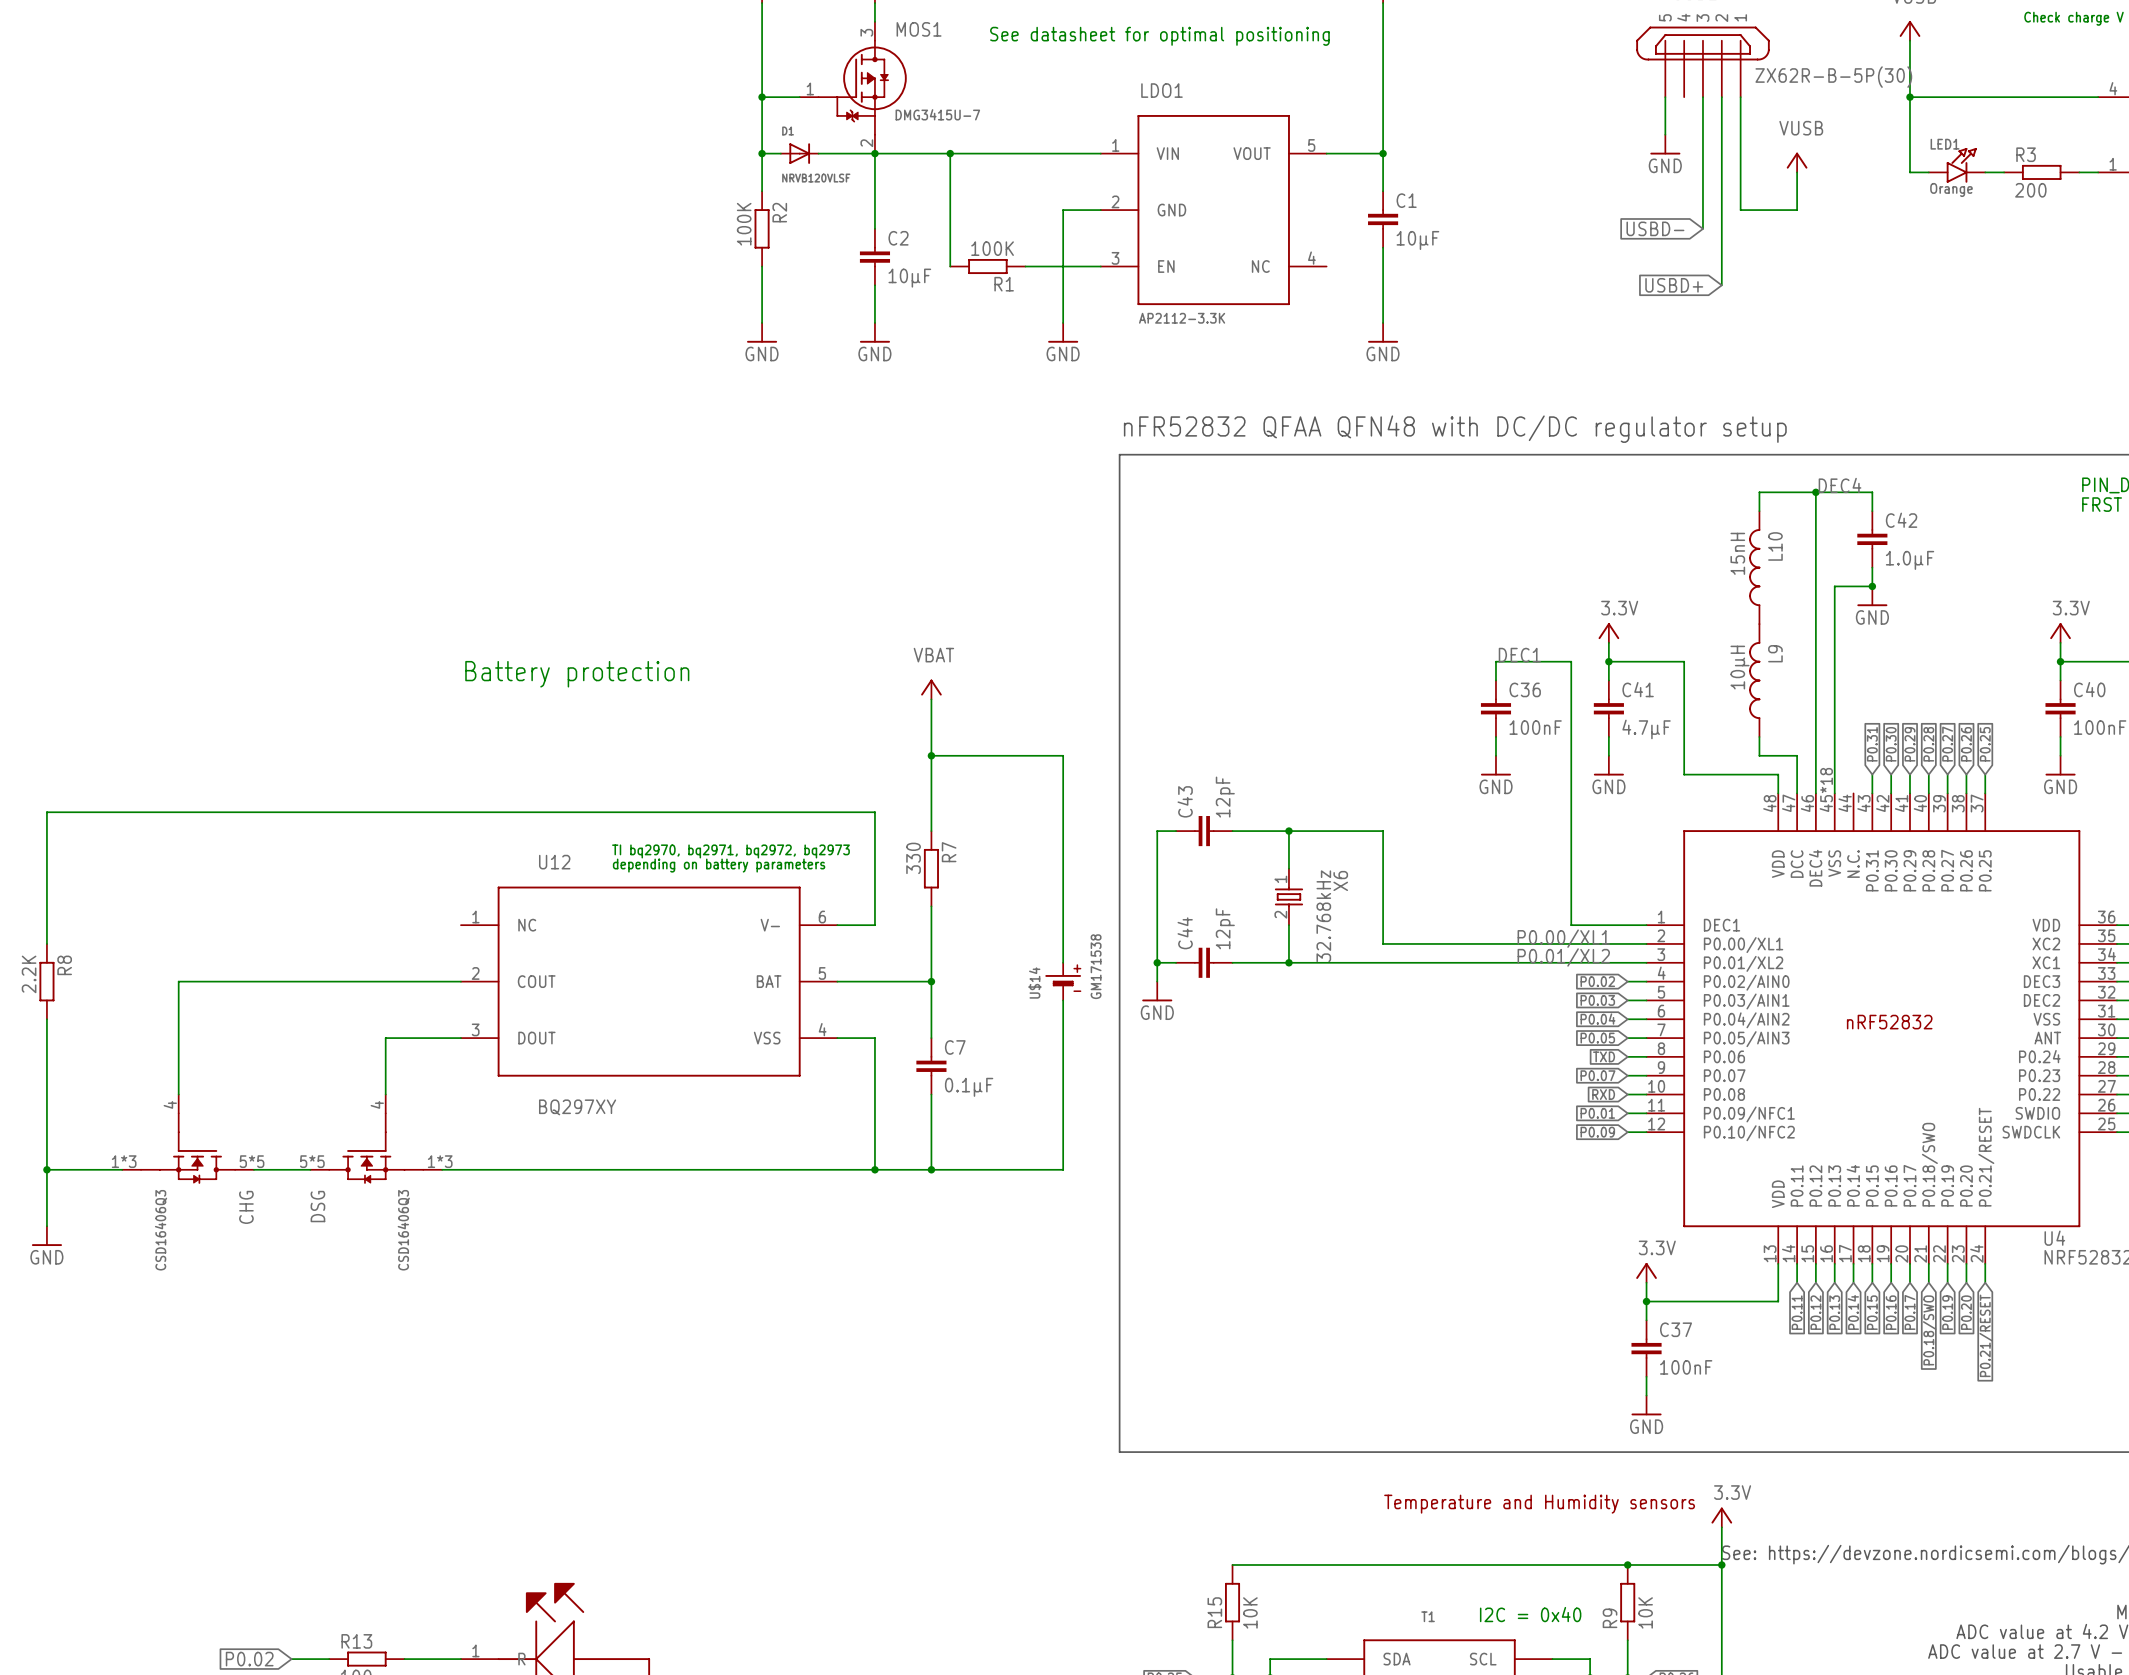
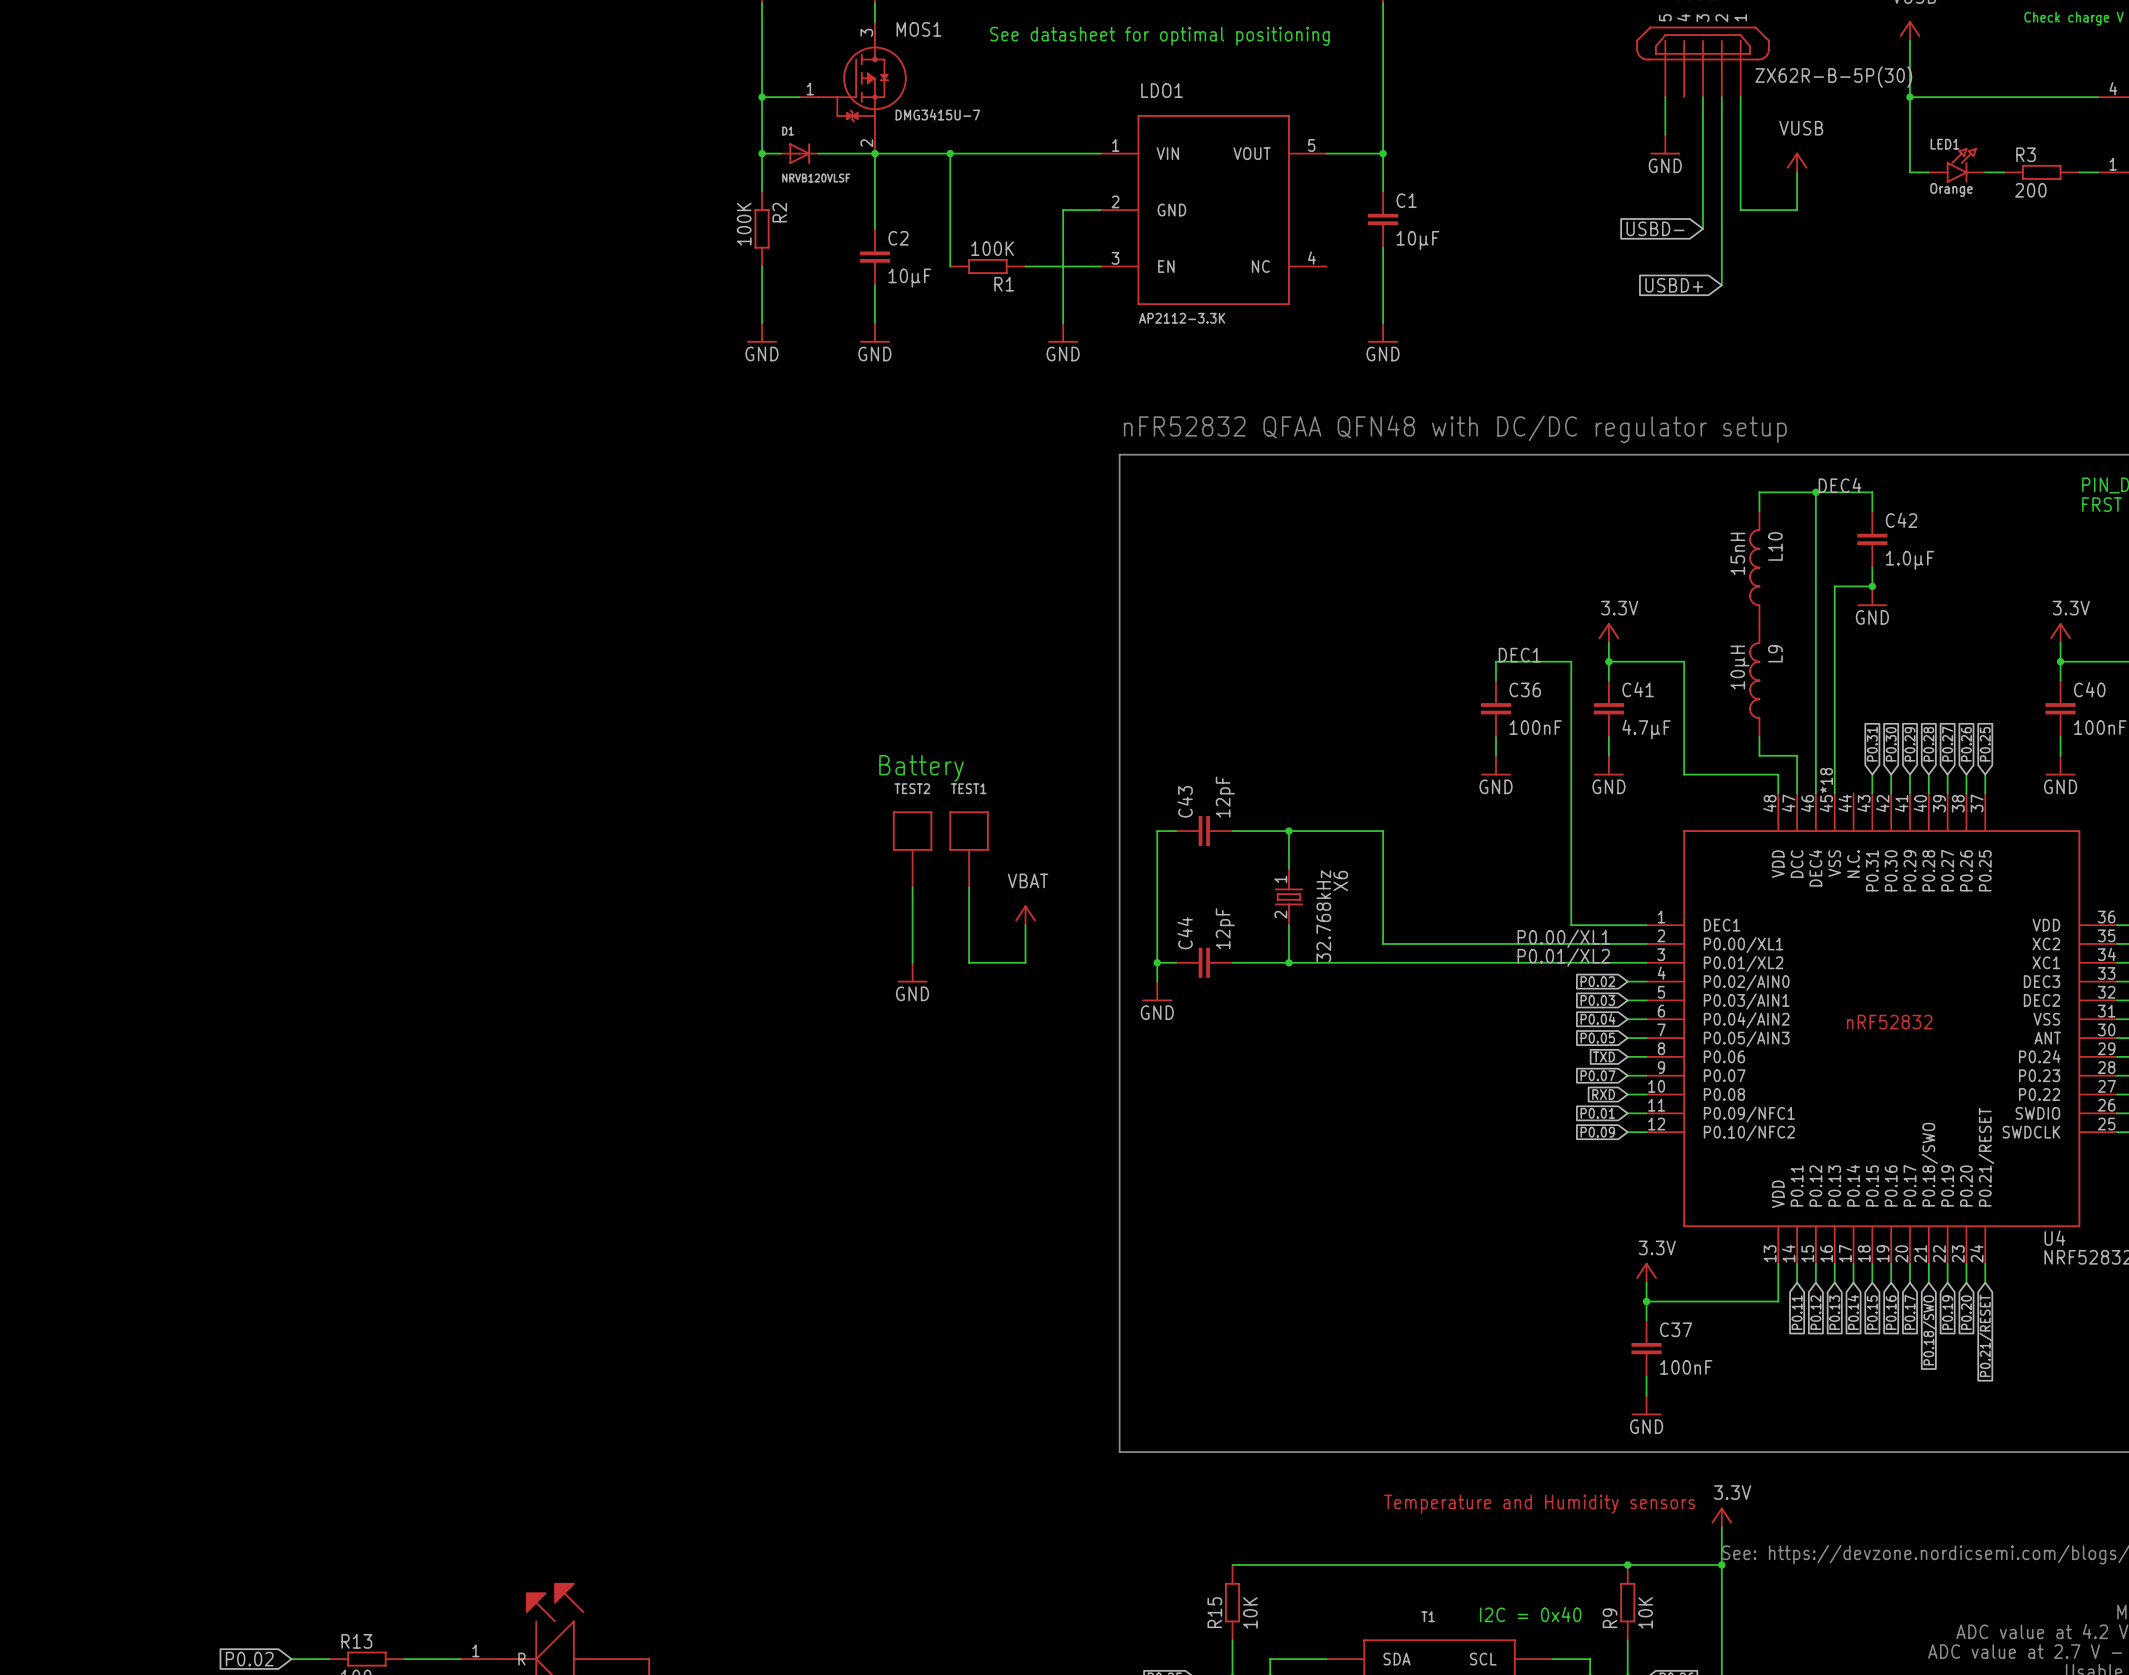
text: Battery protection (577, 674) -> none
power symbol: VBAT (931, 689) -> none
wire: (931, 699) (931, 831) -> none
wire: (931, 755) (1063, 755) (1063, 962) -> none
junction: (931, 755) -> none
text: none -> Battery (921, 768)
TEST2: none -> (912, 849)
TEST1: none -> (969, 849)
text: TI bq2970, bq2971, bq2972, bq2973 (730, 851) -> none
text: depending on battery parameters (719, 865) -> none
R7: 330 (931, 868) -> none
wire: none -> (912, 887) (912, 962)
wire: none -> (969, 887) (969, 962) (1025, 962) (1025, 925)
wire: (931, 906) (931, 1038) -> none
power symbol: none -> VBAT (1025, 915)
wire: (837, 925) (874, 925) (874, 812) (46, 812) (46, 943) -> none
power symbol: none -> GND (912, 972)
R8: 2.2K (46, 981) -> none
wire: (460, 981) (178, 981) (178, 1094) -> none
U12: BQ297XY (649, 981) -> none
wire: (837, 981) (931, 981) -> none
junction: (931, 981) -> none
U$14: GM171538 (1063, 981) -> none
wire: (1063, 1000) (1063, 1169) (442, 1169) -> none
wire: (46, 1019) (46, 1226) -> none
wire: (460, 1038) (385, 1038) (385, 1094) -> none
wire: (837, 1038) (874, 1038) (874, 1169) -> none
C7: 0.1µF (931, 1066) -> none
wire: (931, 1094) (931, 1169) -> none
CHG: CSD16406Q3 (188, 1139) -> none
DSG: CSD16406Q3 (376, 1139) -> none
wire: (46, 1169) (122, 1169) -> none
junction: (46, 1169) -> none
wire: (253, 1169) (310, 1169) -> none
junction: (874, 1169) -> none
junction: (931, 1169) -> none
power symbol: GND (46, 1236) -> none

